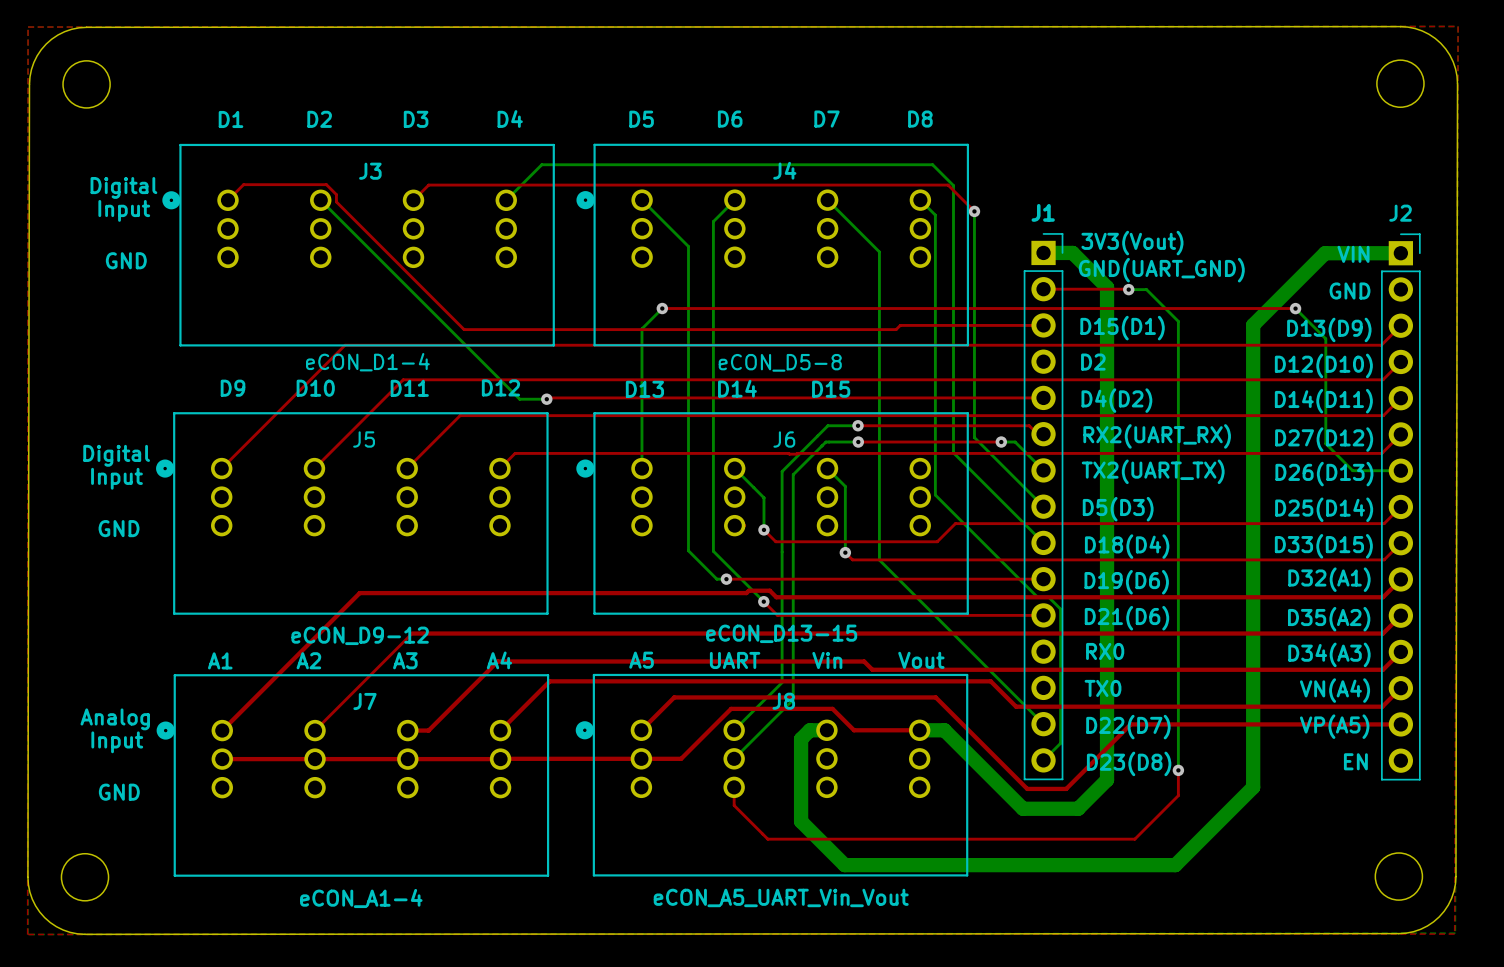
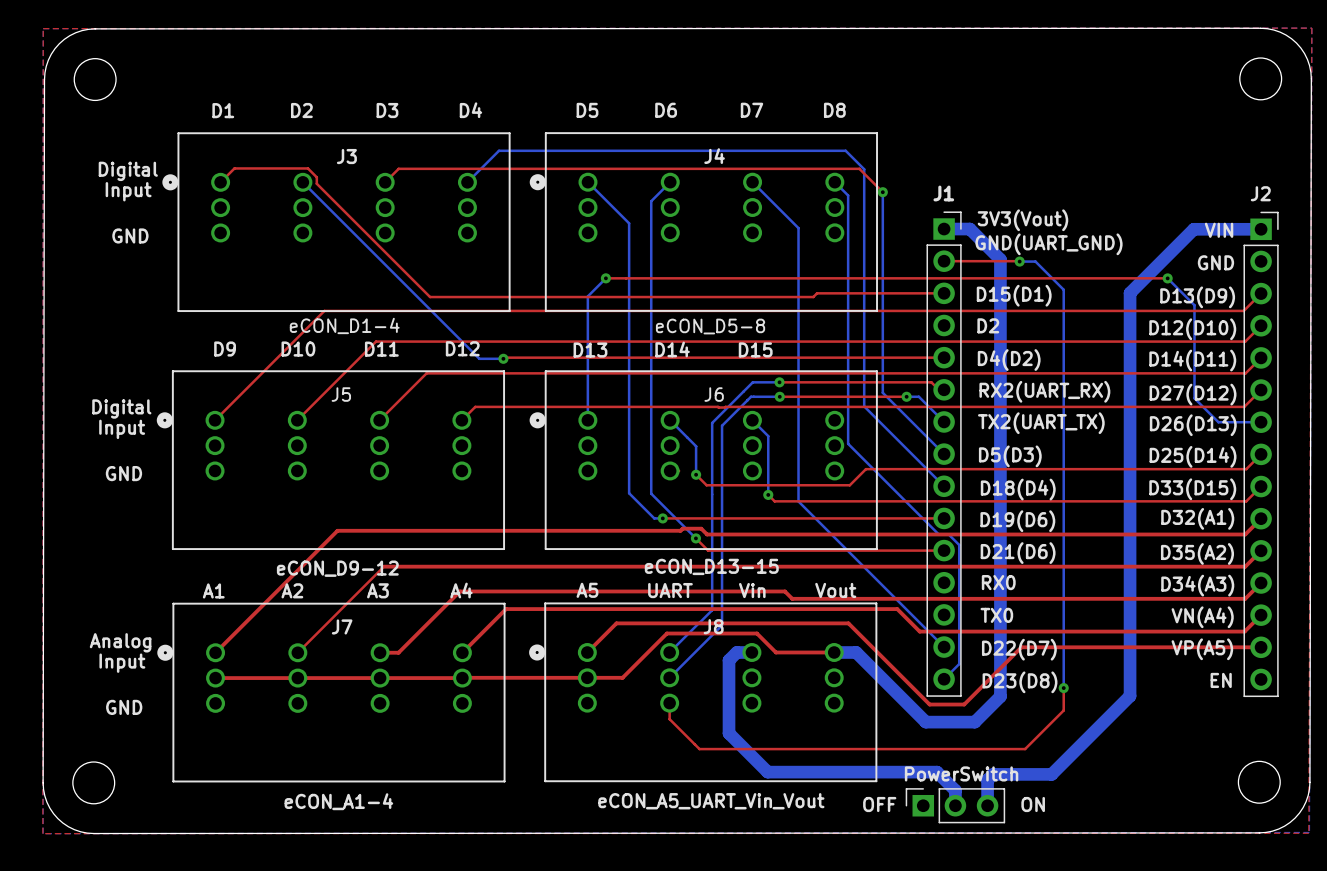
bottom track: (1253, 779) (1253, 787) (1175, 865) (1035, 865) -> (1130, 696) (1051, 774) (993, 774) (987, 780) (987, 805)
bottom track: none -> (937, 772) (955, 790) (955, 805)
text: none -> OFF (879, 804)
text: none -> ON (1033, 804)
part: none -> PowerSwitch (955, 805)

